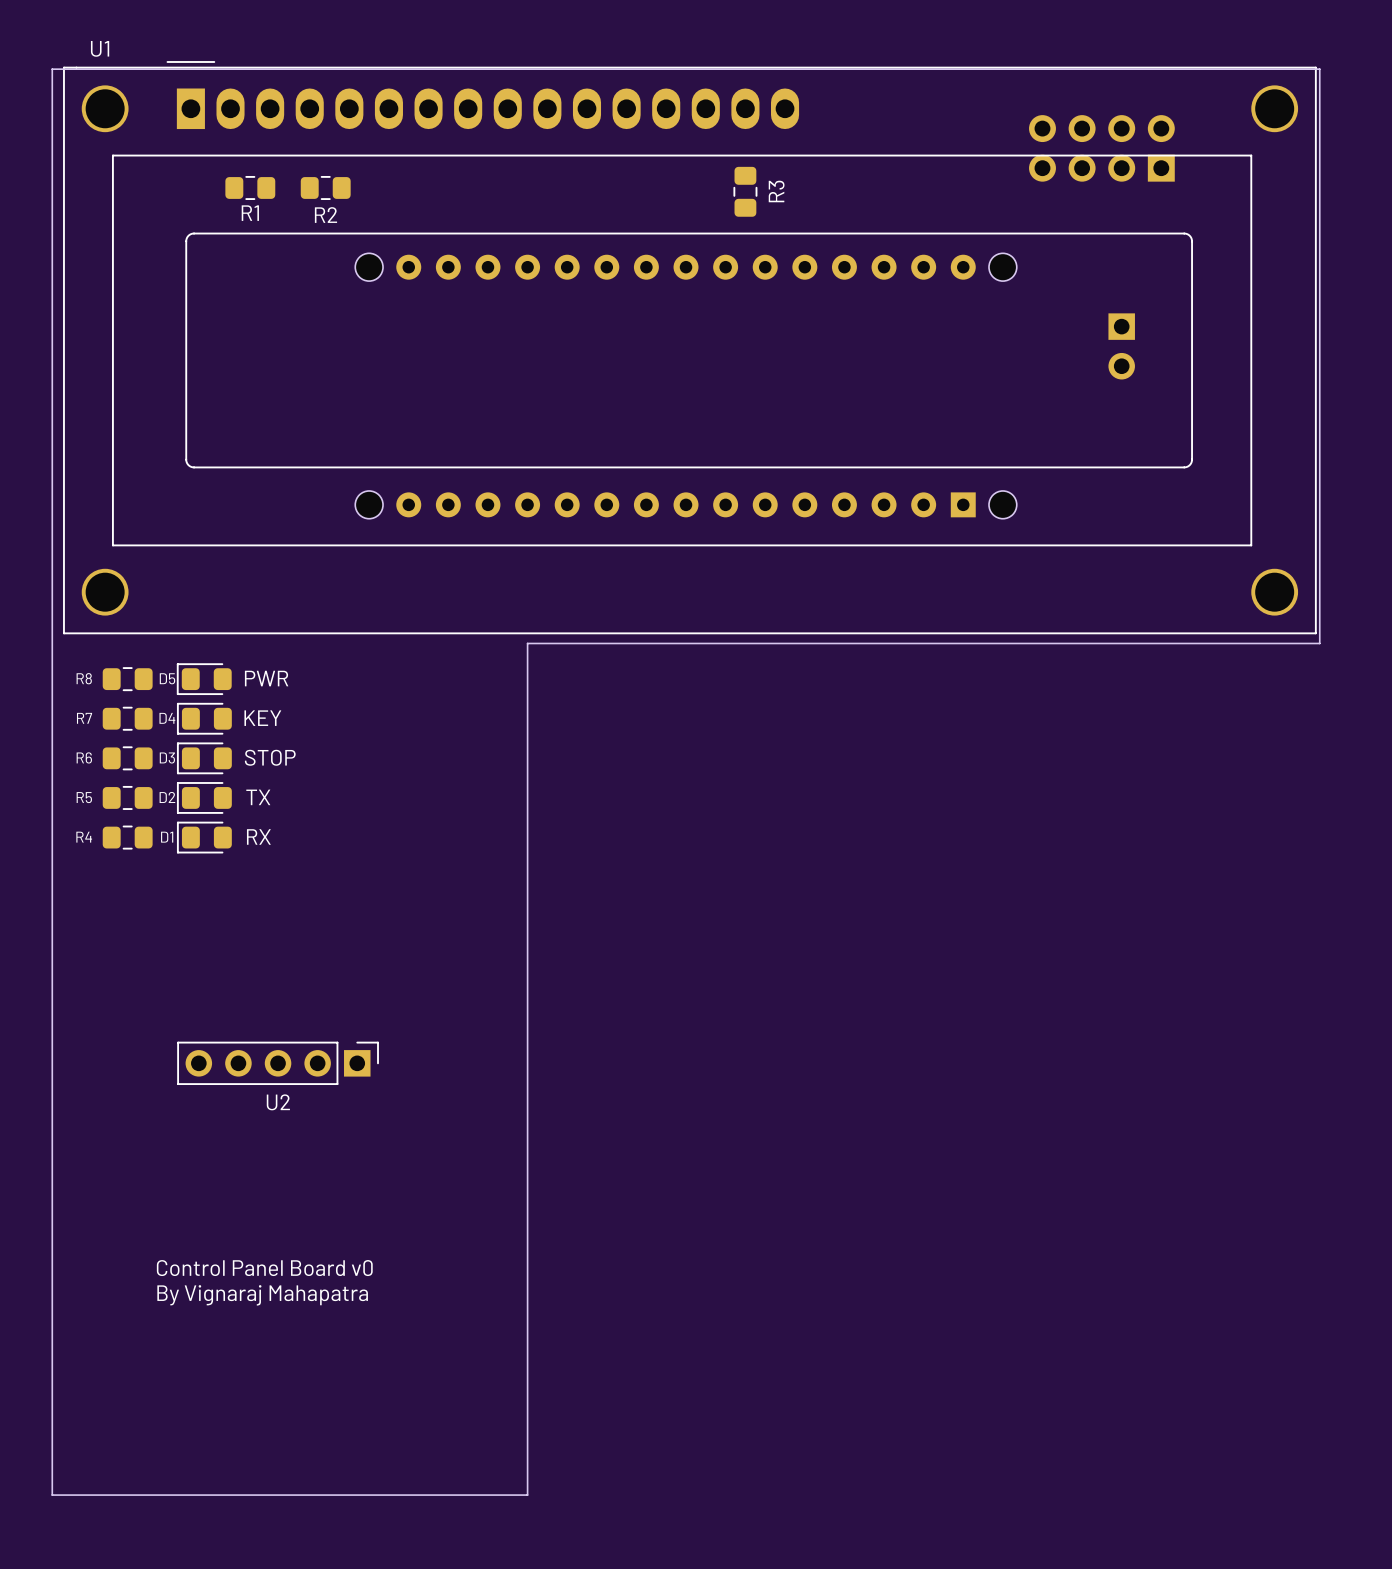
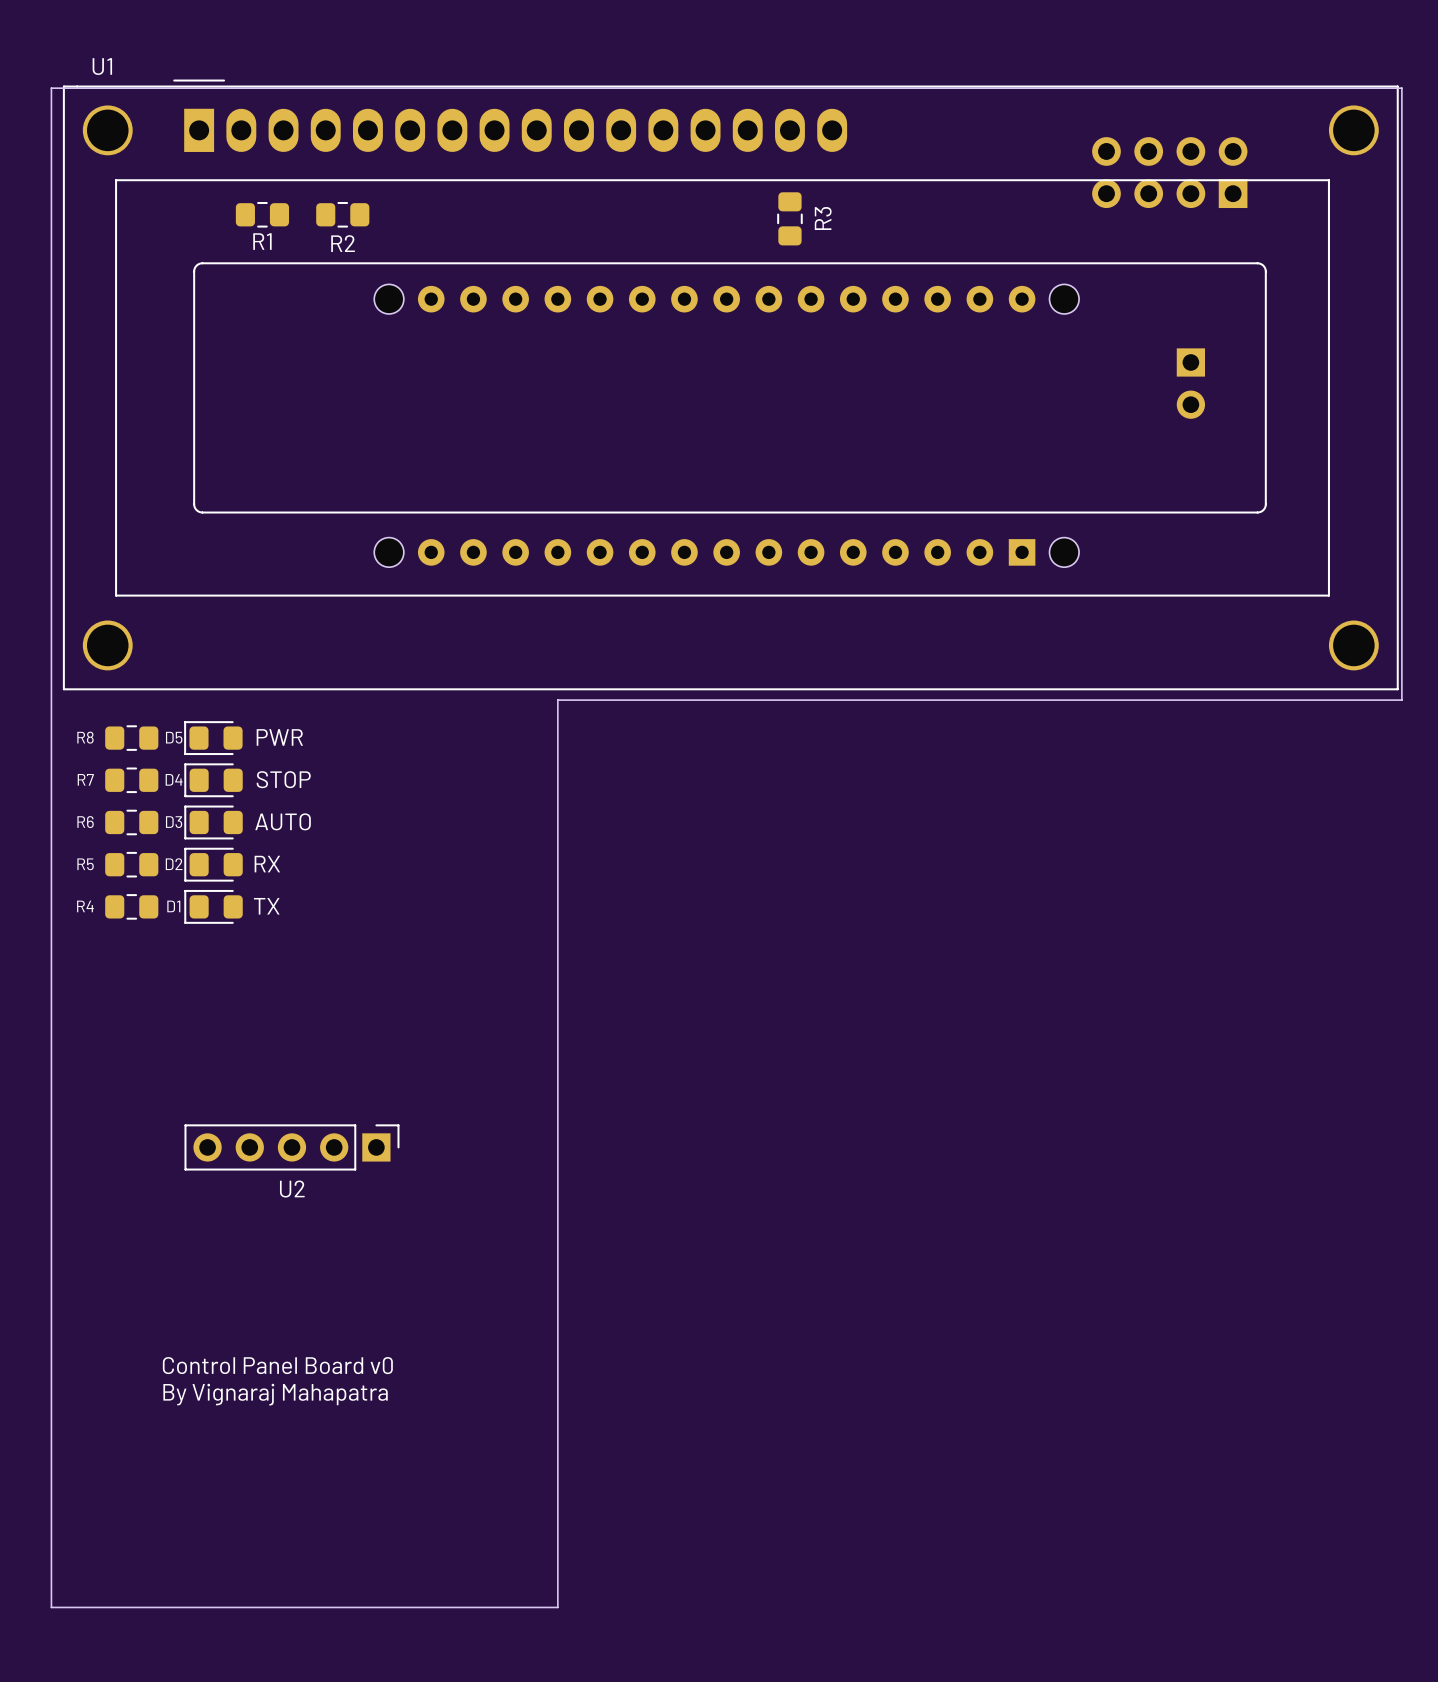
text: KEY (262, 718) -> STOP (283, 779)
text: STOP (270, 757) -> AUTO (283, 821)
text: TX (258, 797) -> RX (267, 864)
text: RX (258, 836) -> TX (266, 906)

